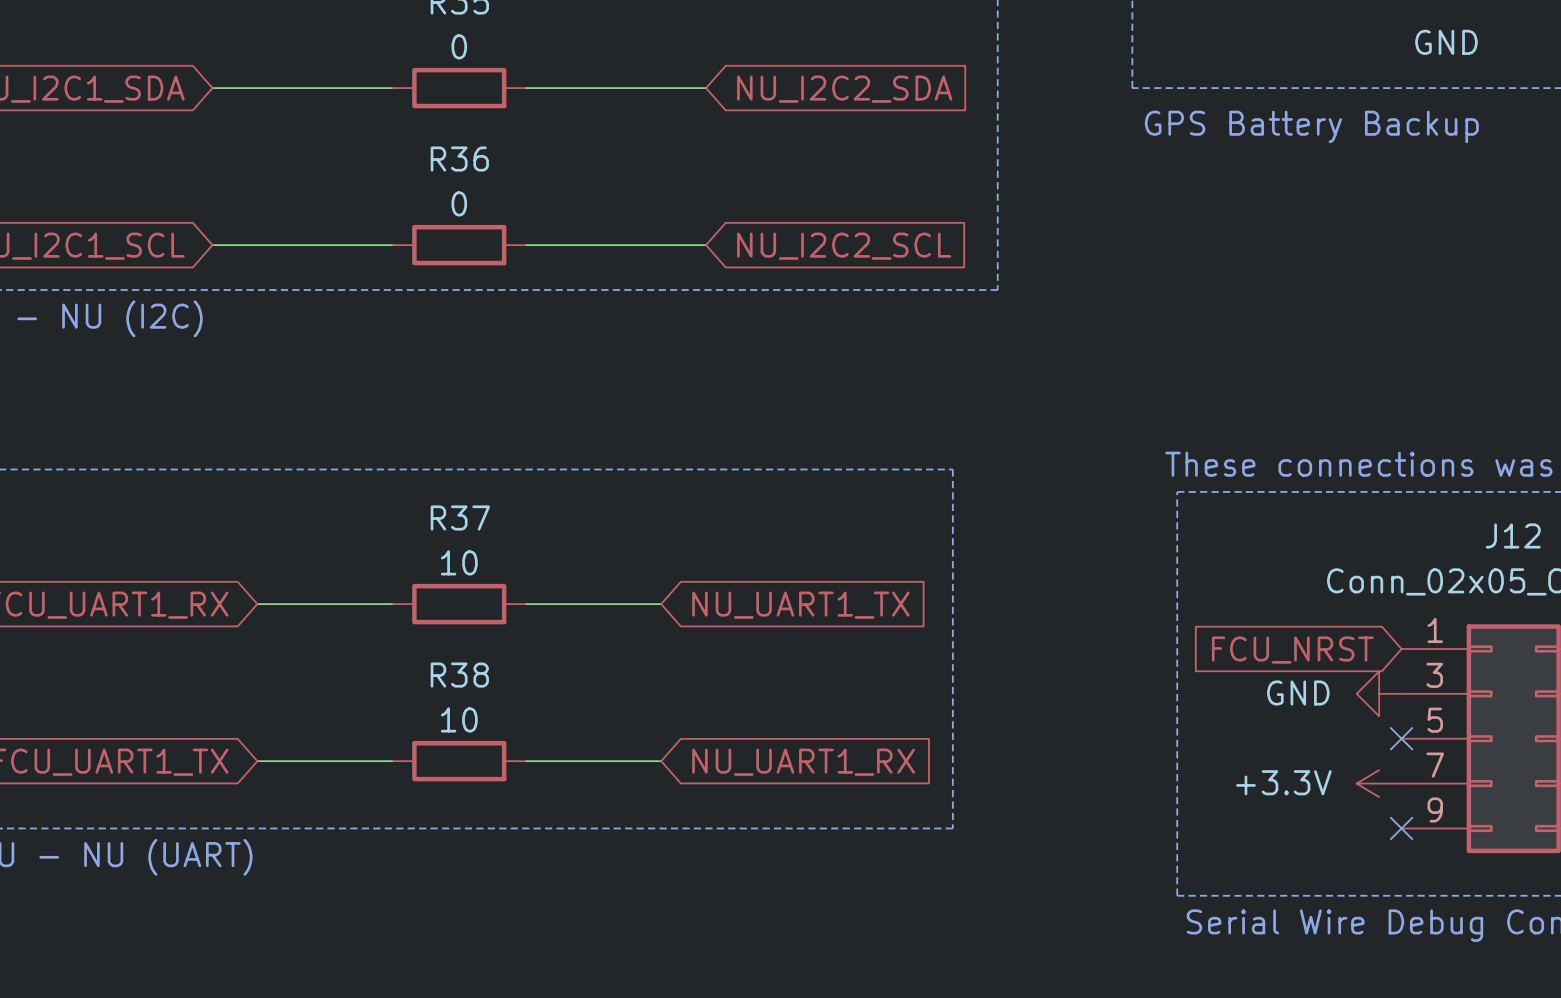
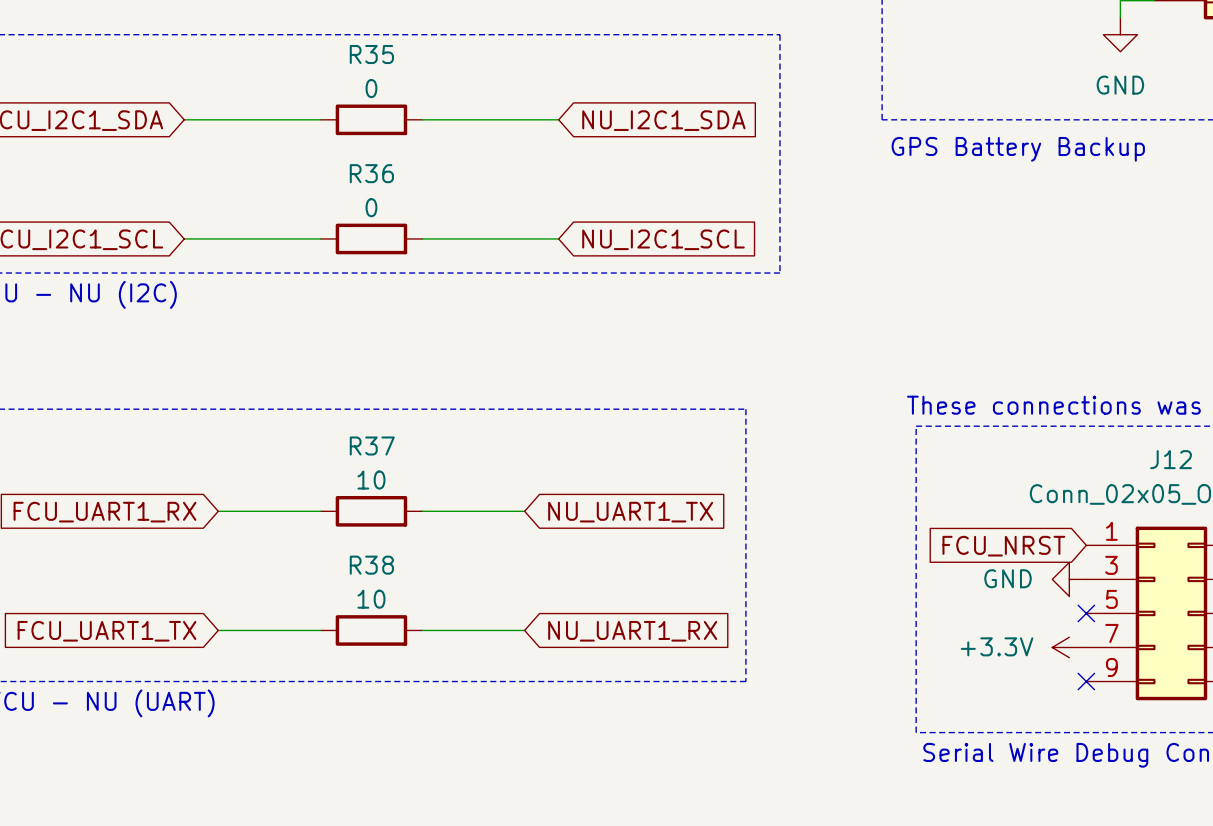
global label: NU_I2C2_SDA (844, 89) -> NU_I2C1_SDA (663, 120)
global label: NU_I2C2_SCL (844, 246) -> NU_I2C1_SCL (663, 239)

